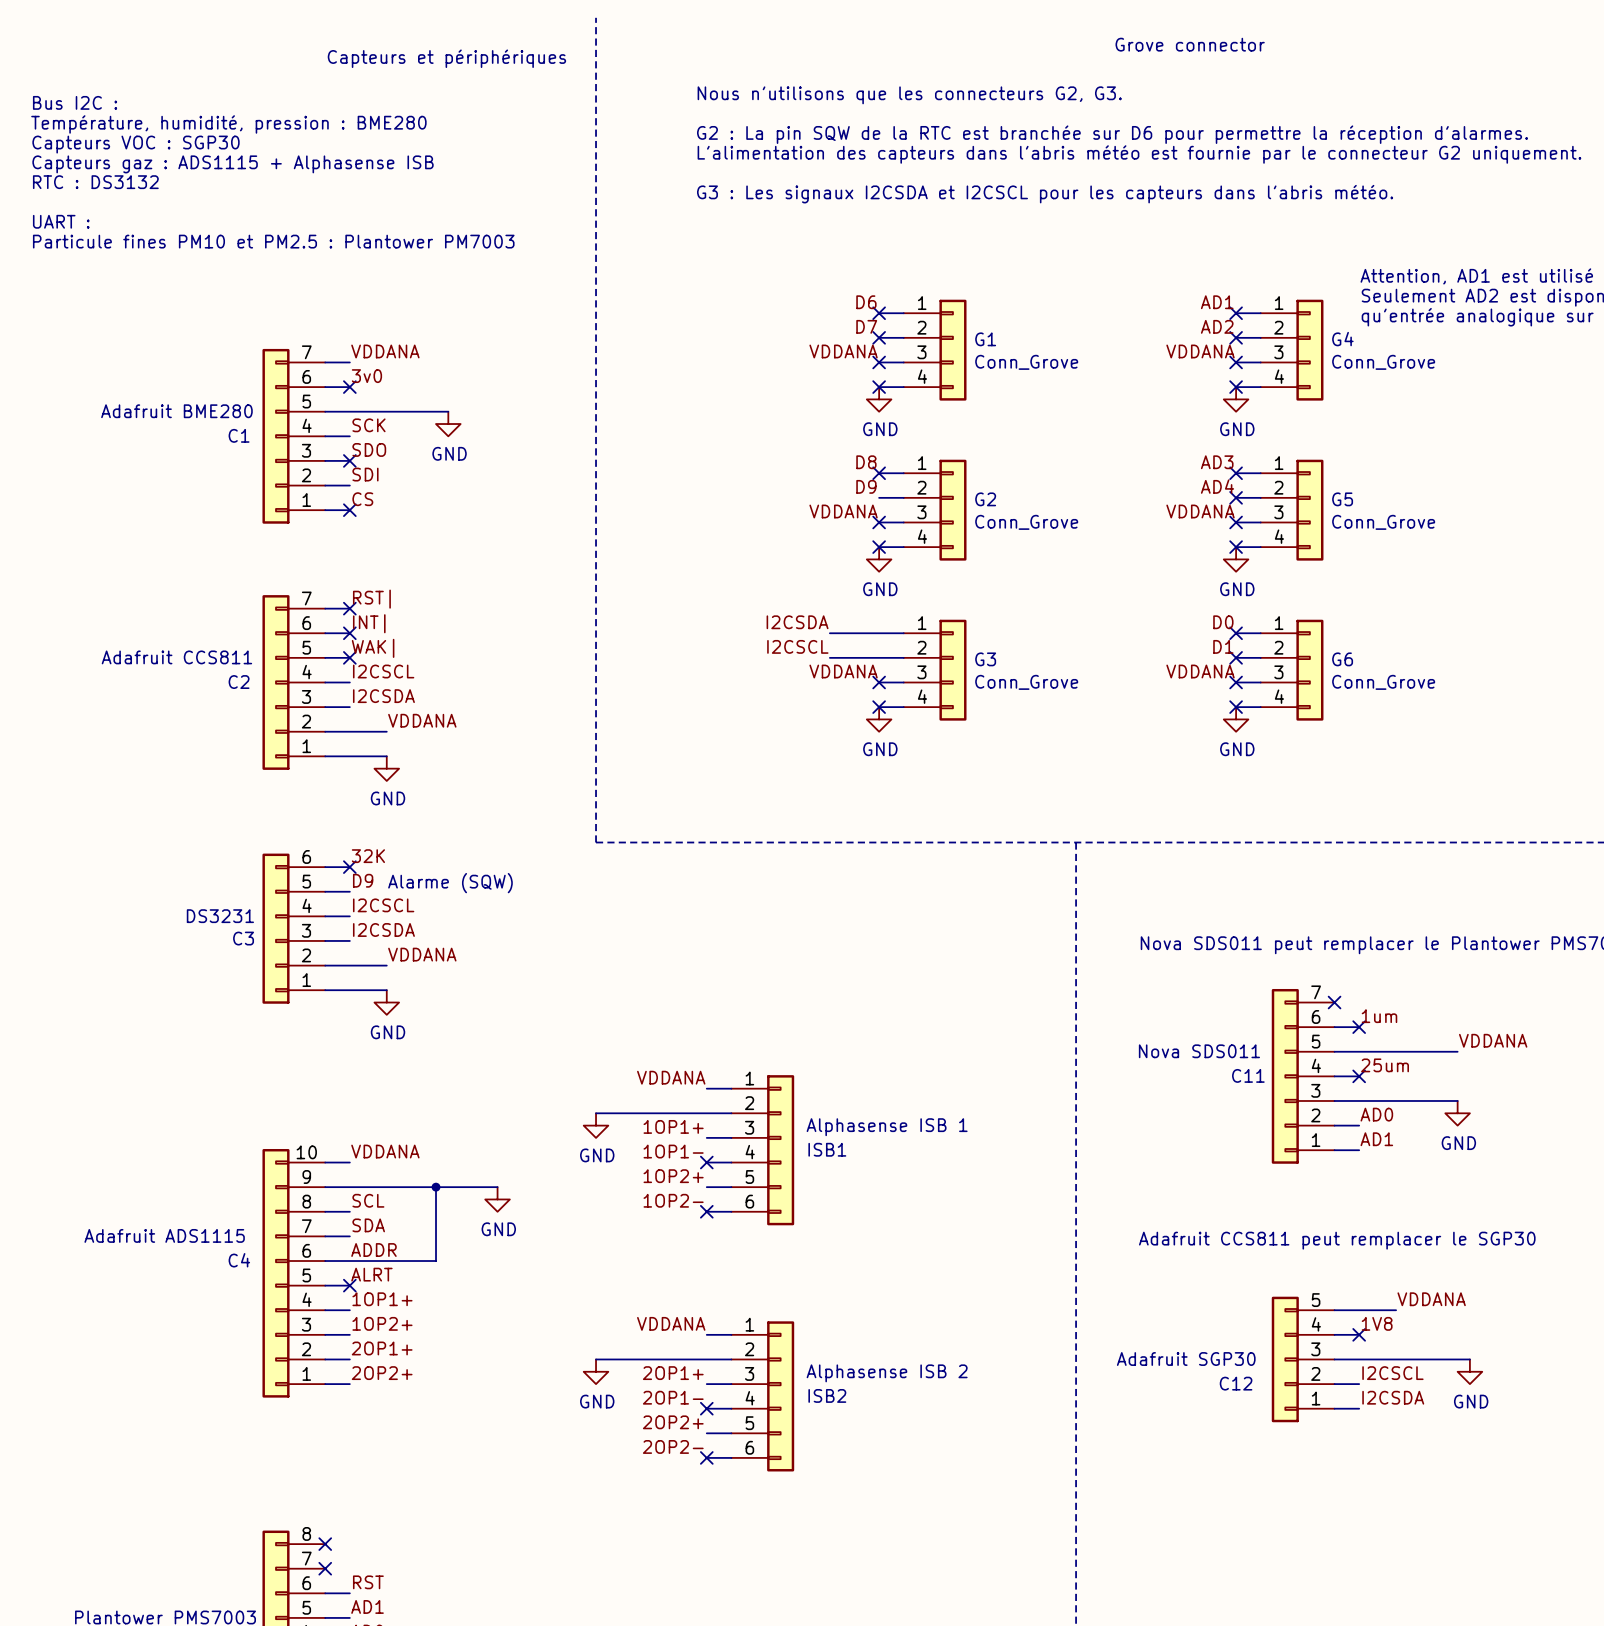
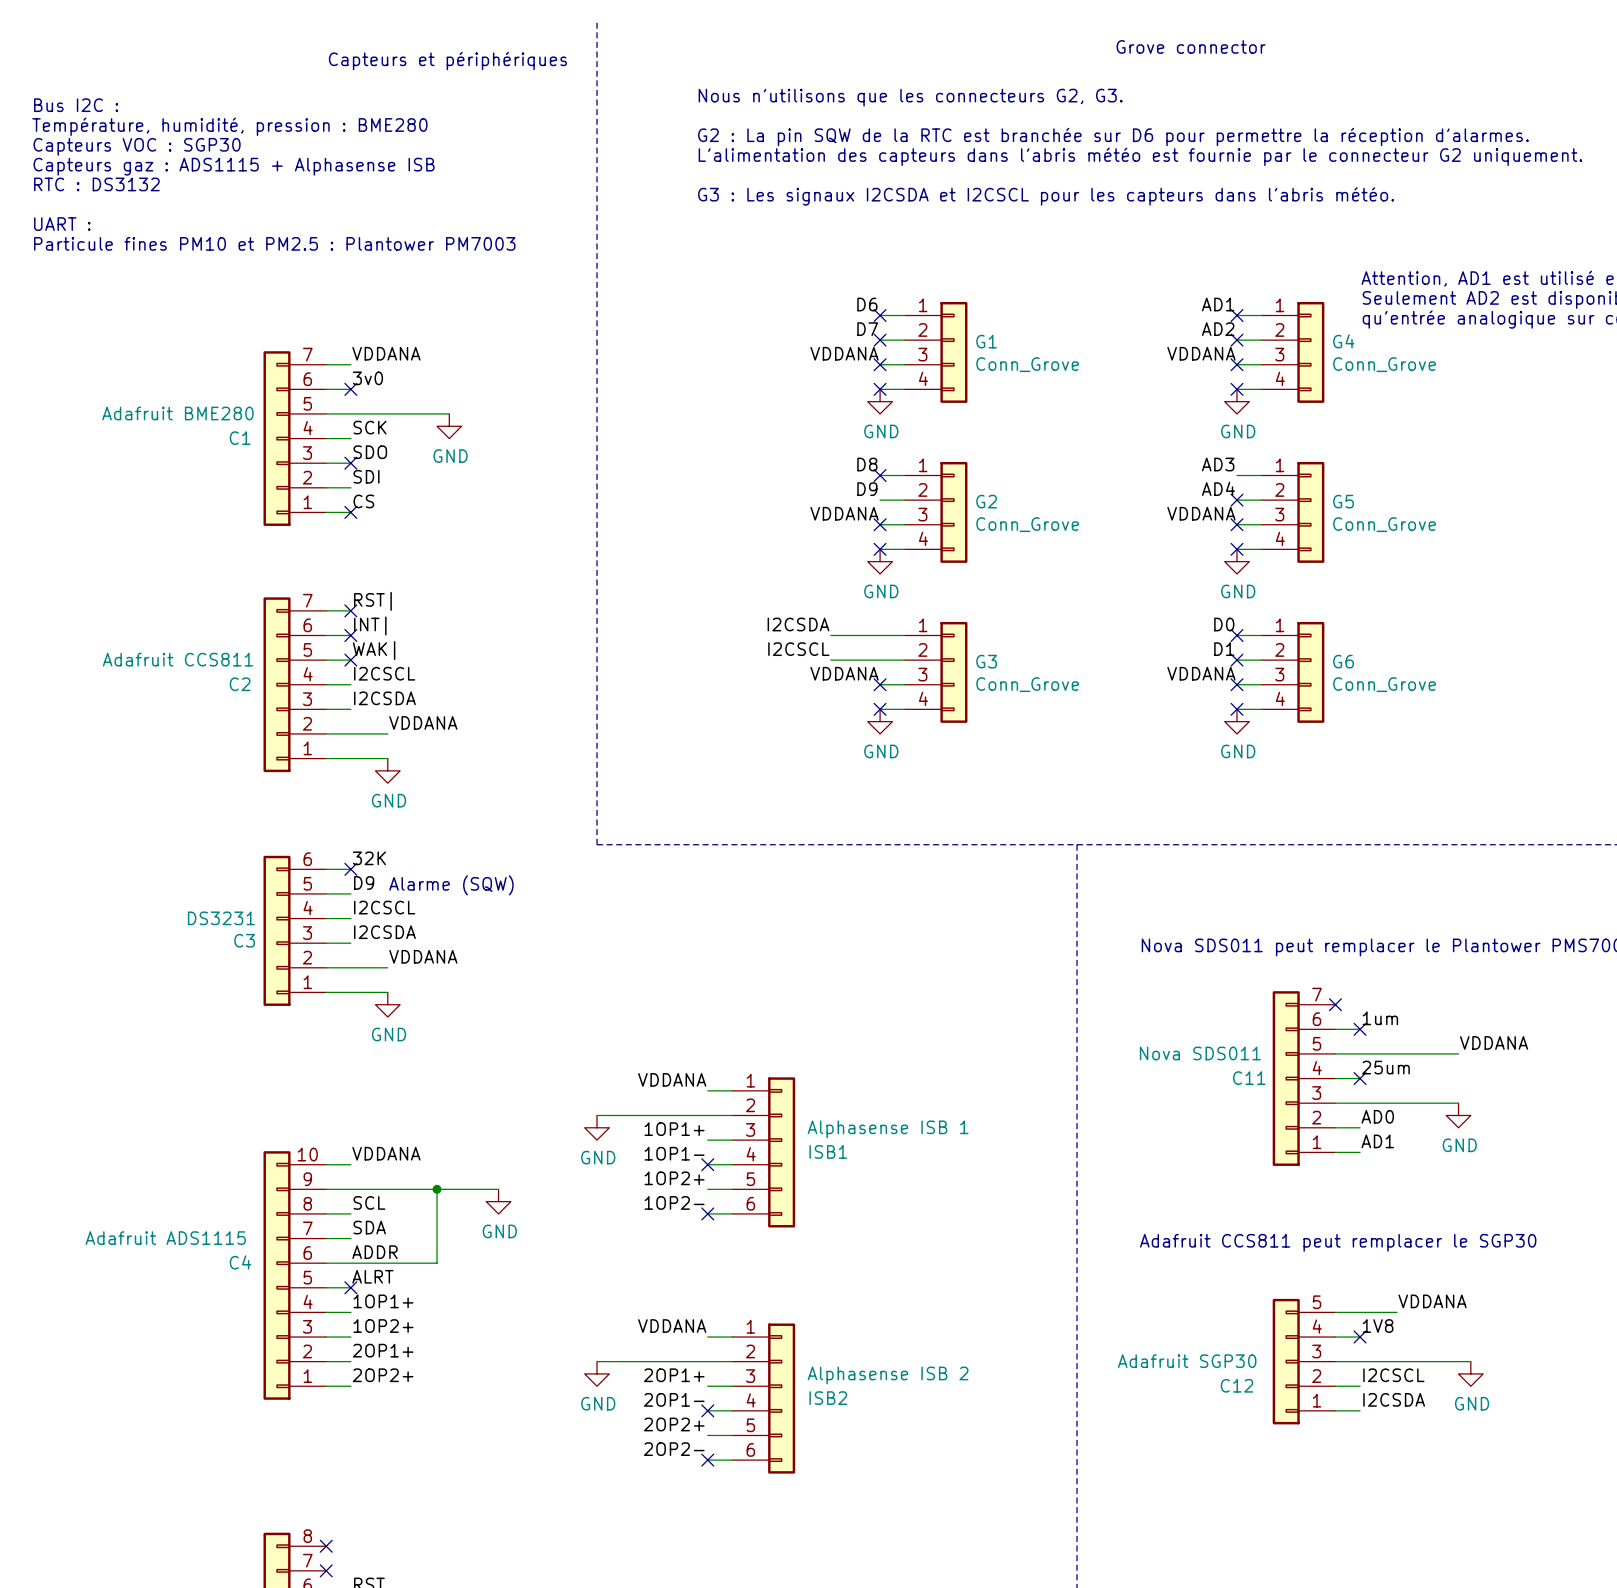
no-connect mark: (1236, 473) -> none

